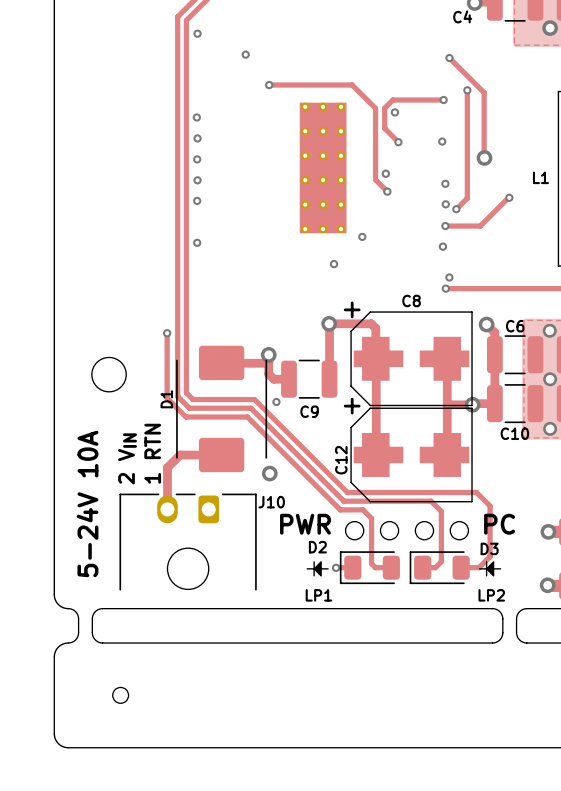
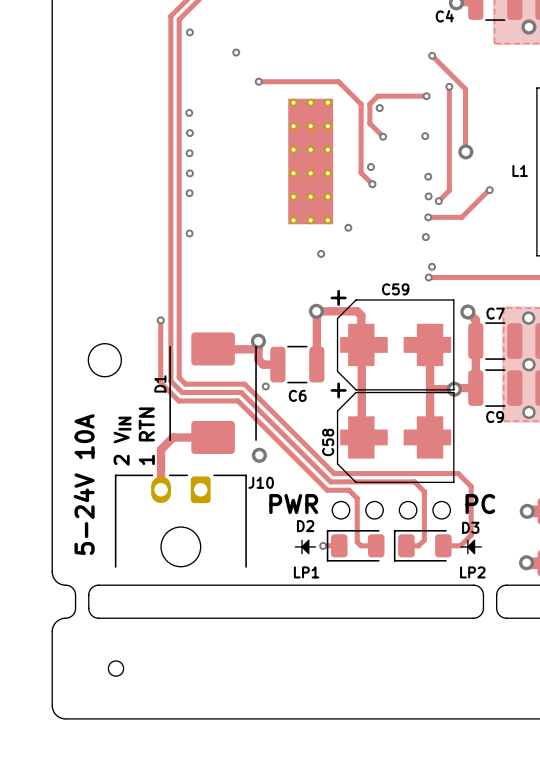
C8 name: C8 (411, 300) -> C59 (395, 289)
C6 name: C6 (515, 326) -> C7 (495, 313)
C9 name: C9 (309, 411) -> C6 (297, 395)
C10 name: C10 (514, 433) -> C9 (495, 417)
C12 name: C12 (341, 460) -> C58 (328, 442)

